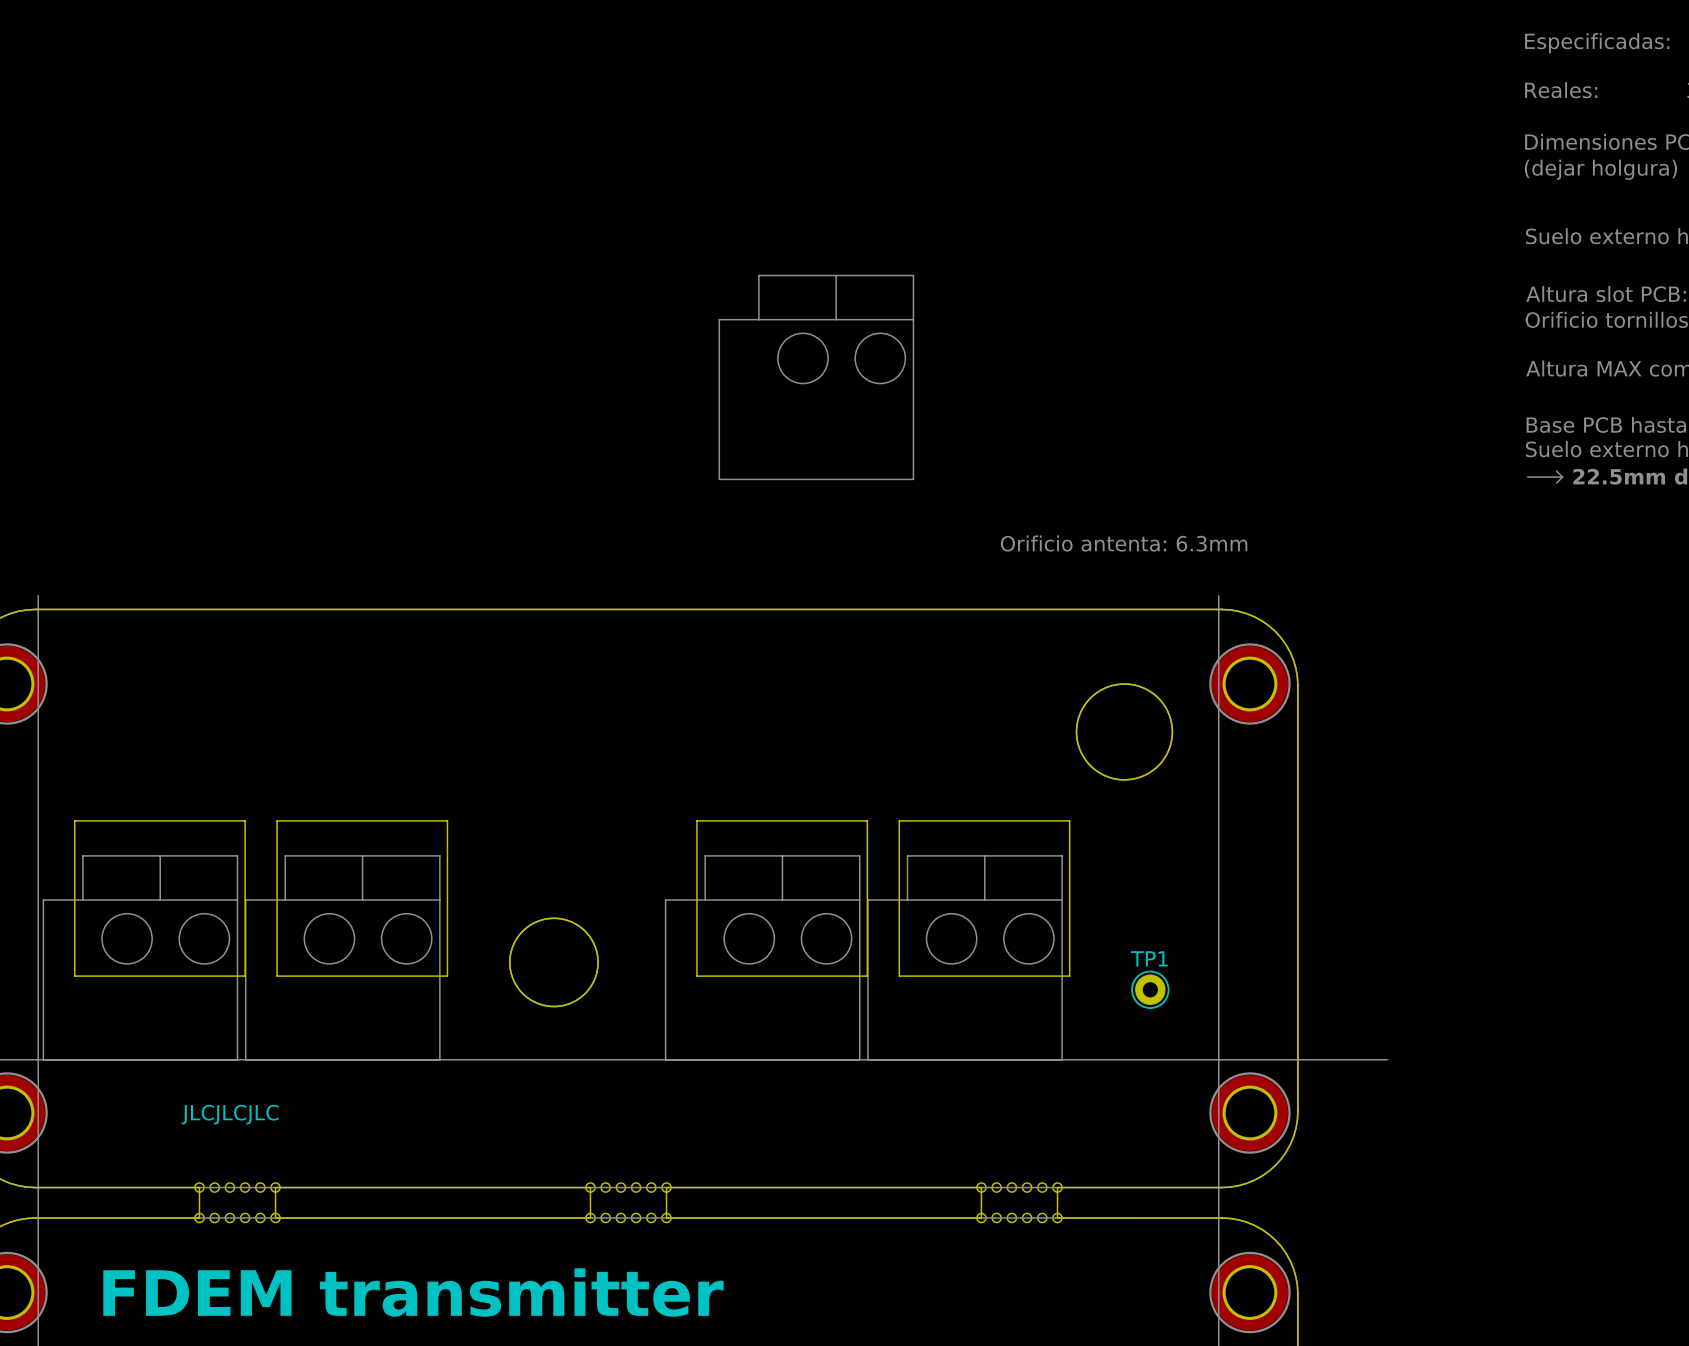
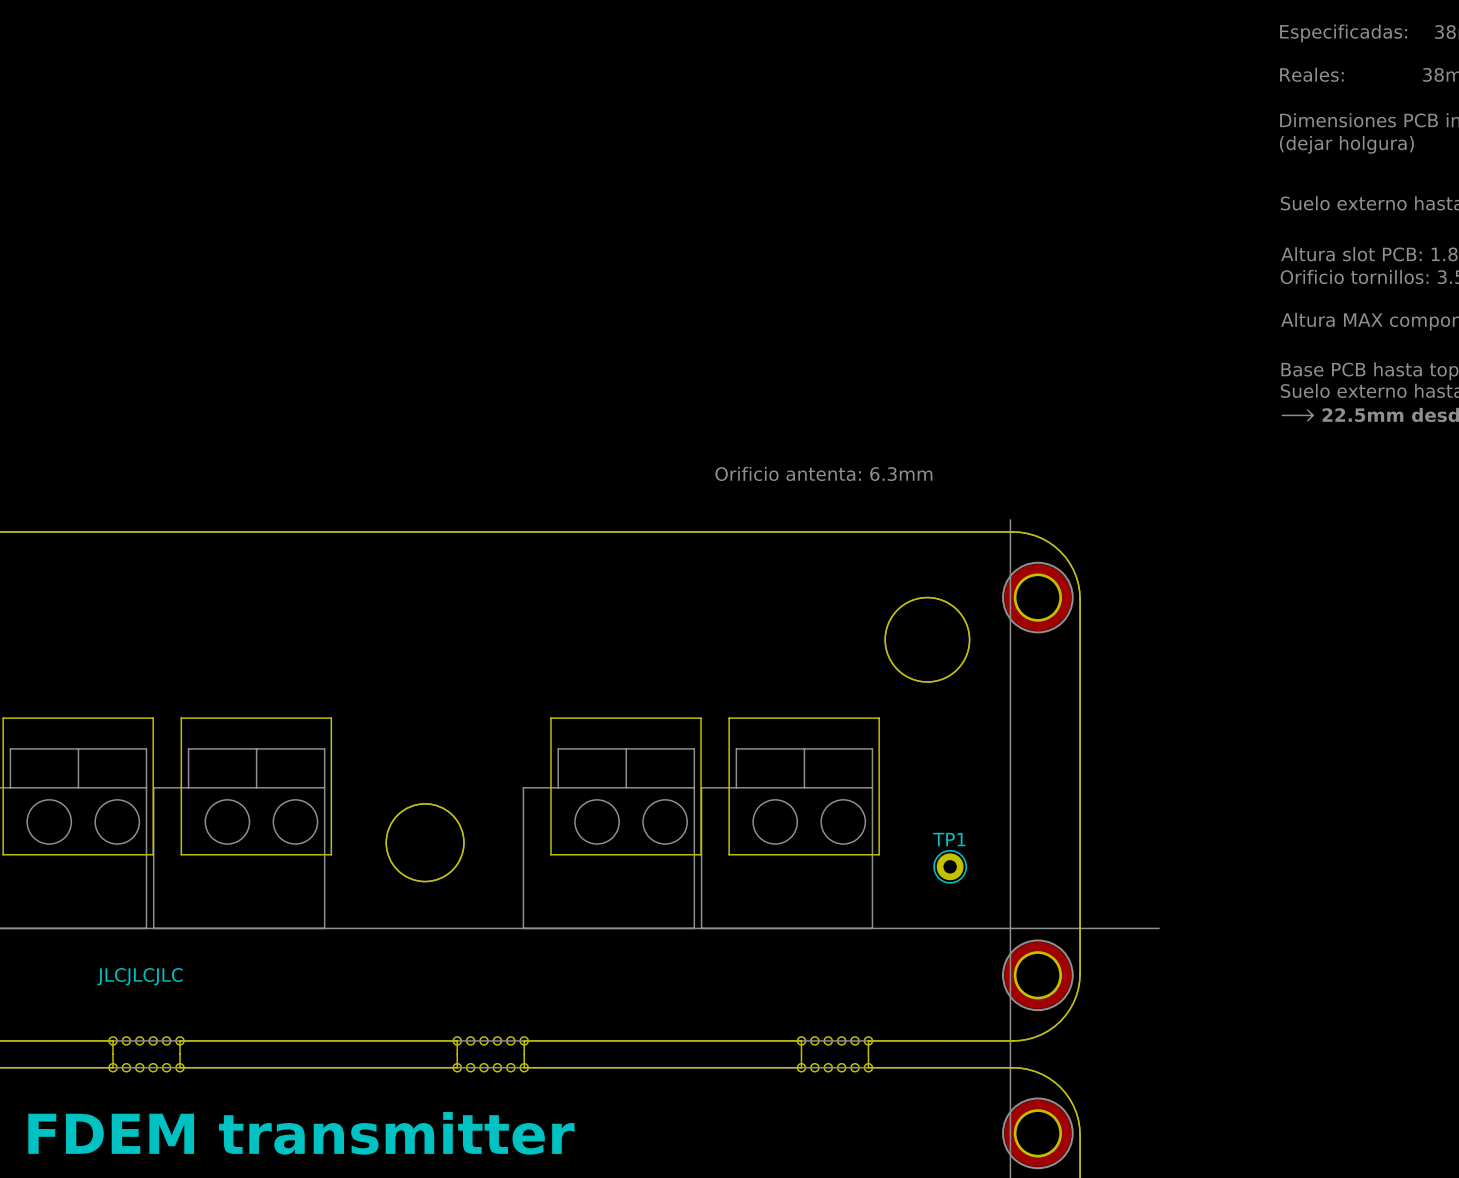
line: (836, 275) (836, 319) -> none
line: (758, 319) (758, 275) (913, 275) (913, 479) (719, 479) (719, 319) (913, 319) -> none
drawing: [777, 332, 829, 385] -> none
drawing: [854, 332, 907, 385] -> none
text position: Orificio antenta: 6.3mm (1124, 543) -> Orificio antenta: 6.3mm (823, 473)

